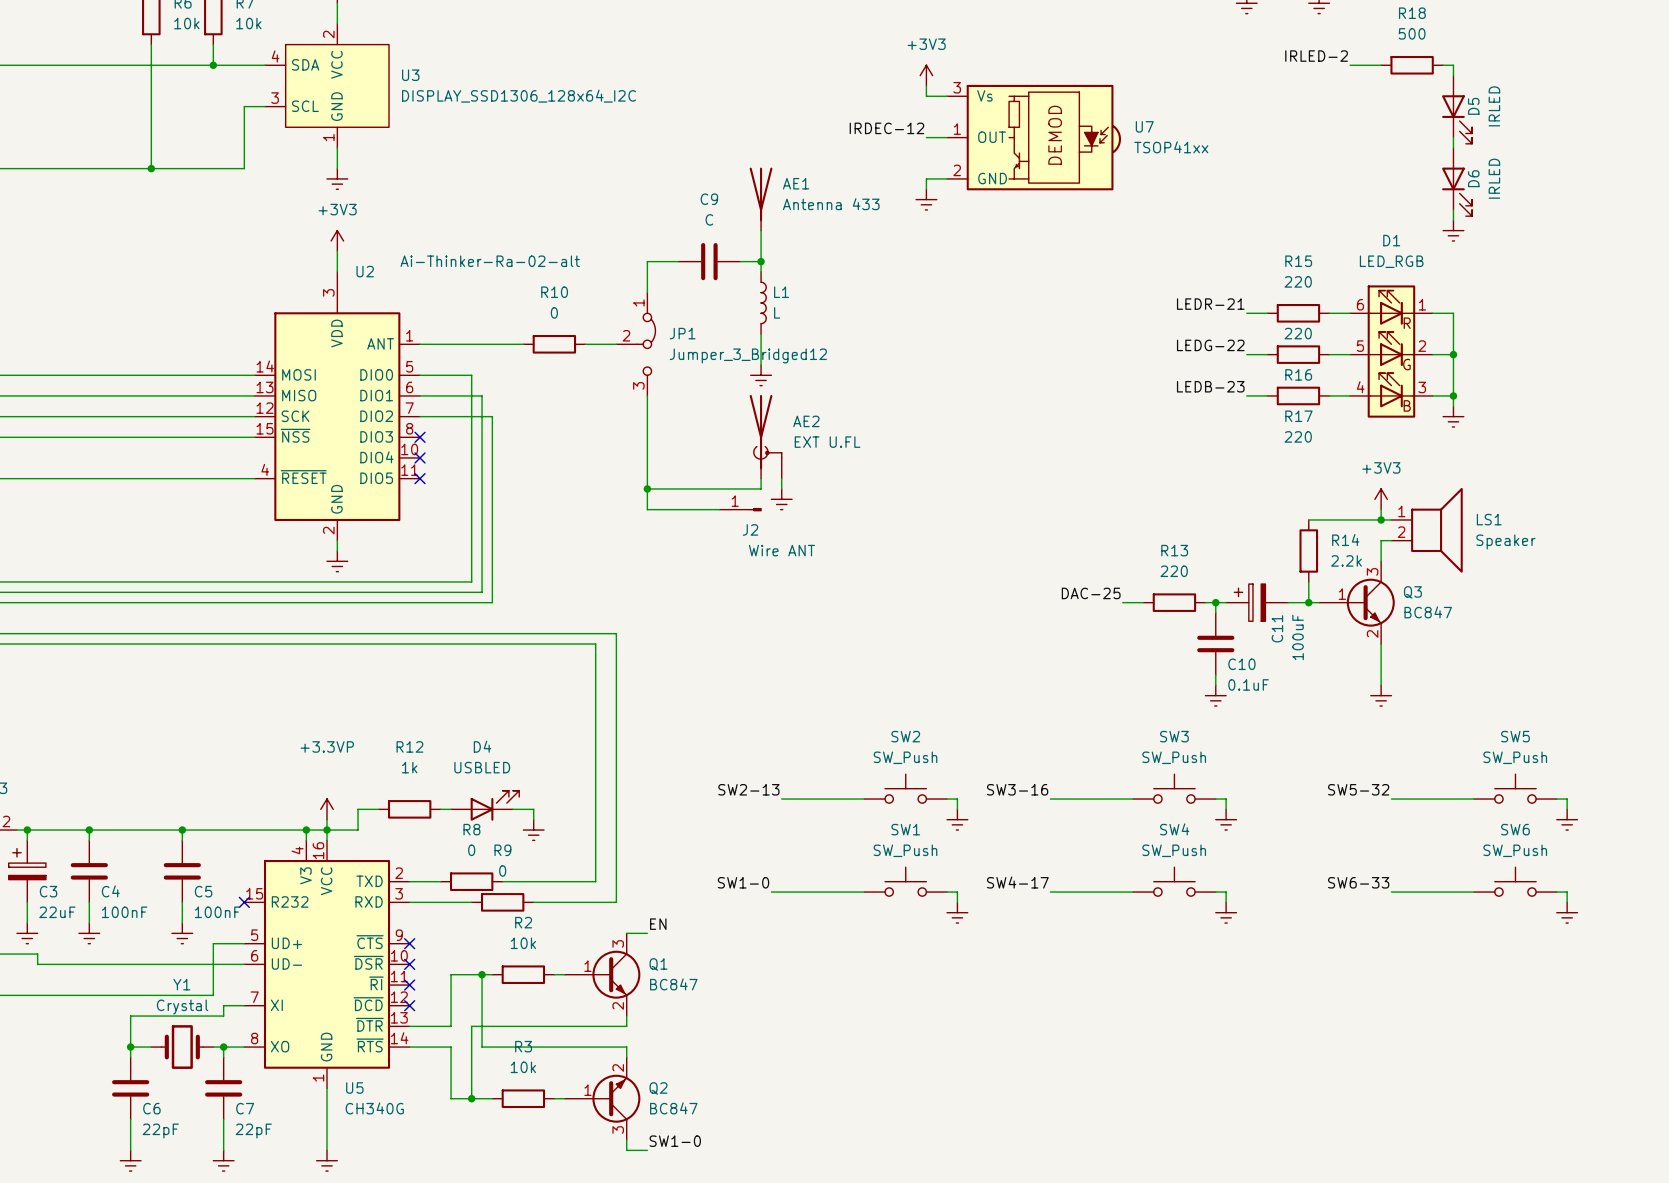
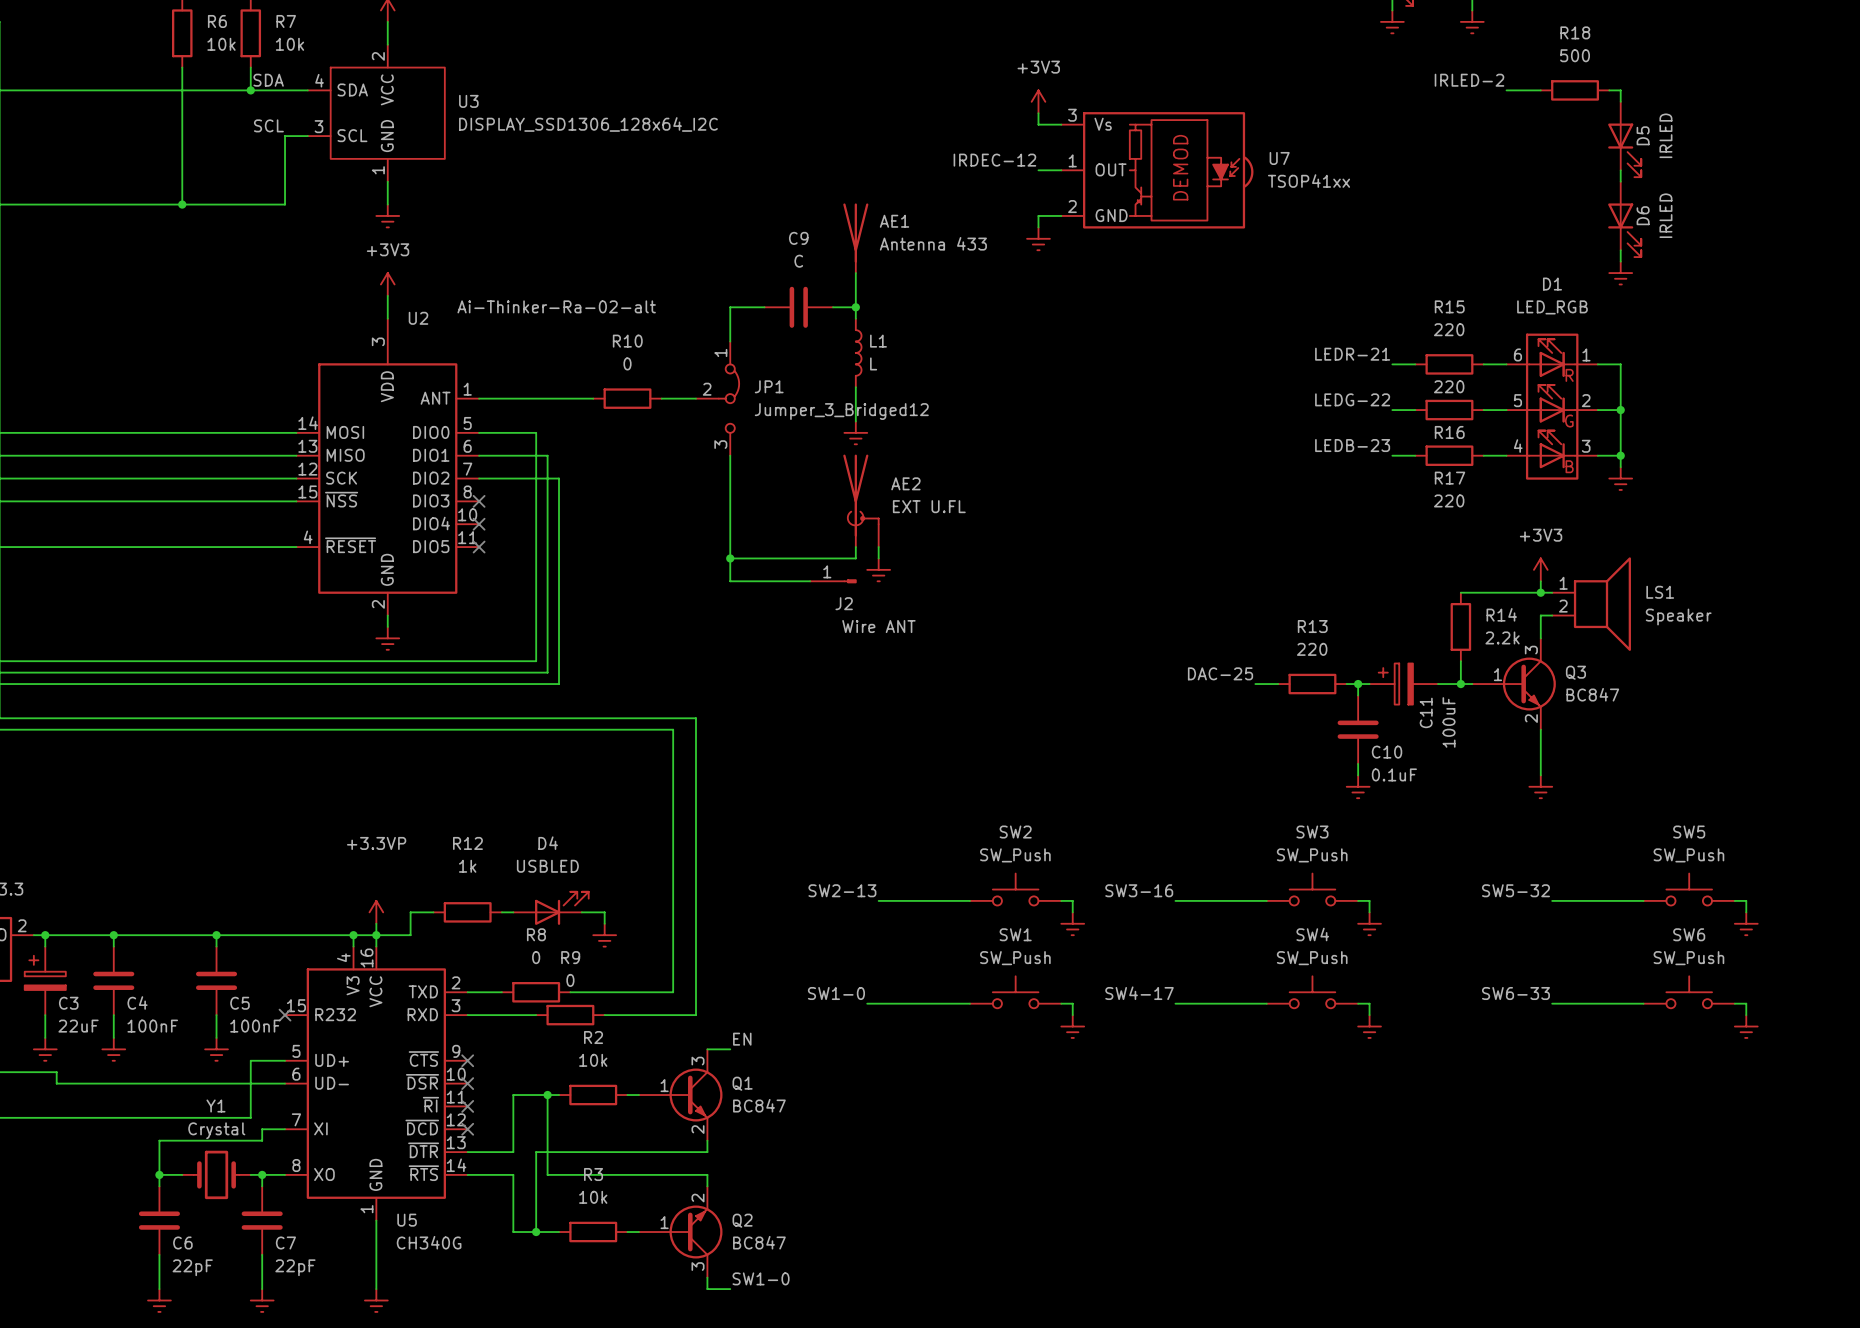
label: none -> SDA (268, 80)
label: none -> SCL (268, 125)

